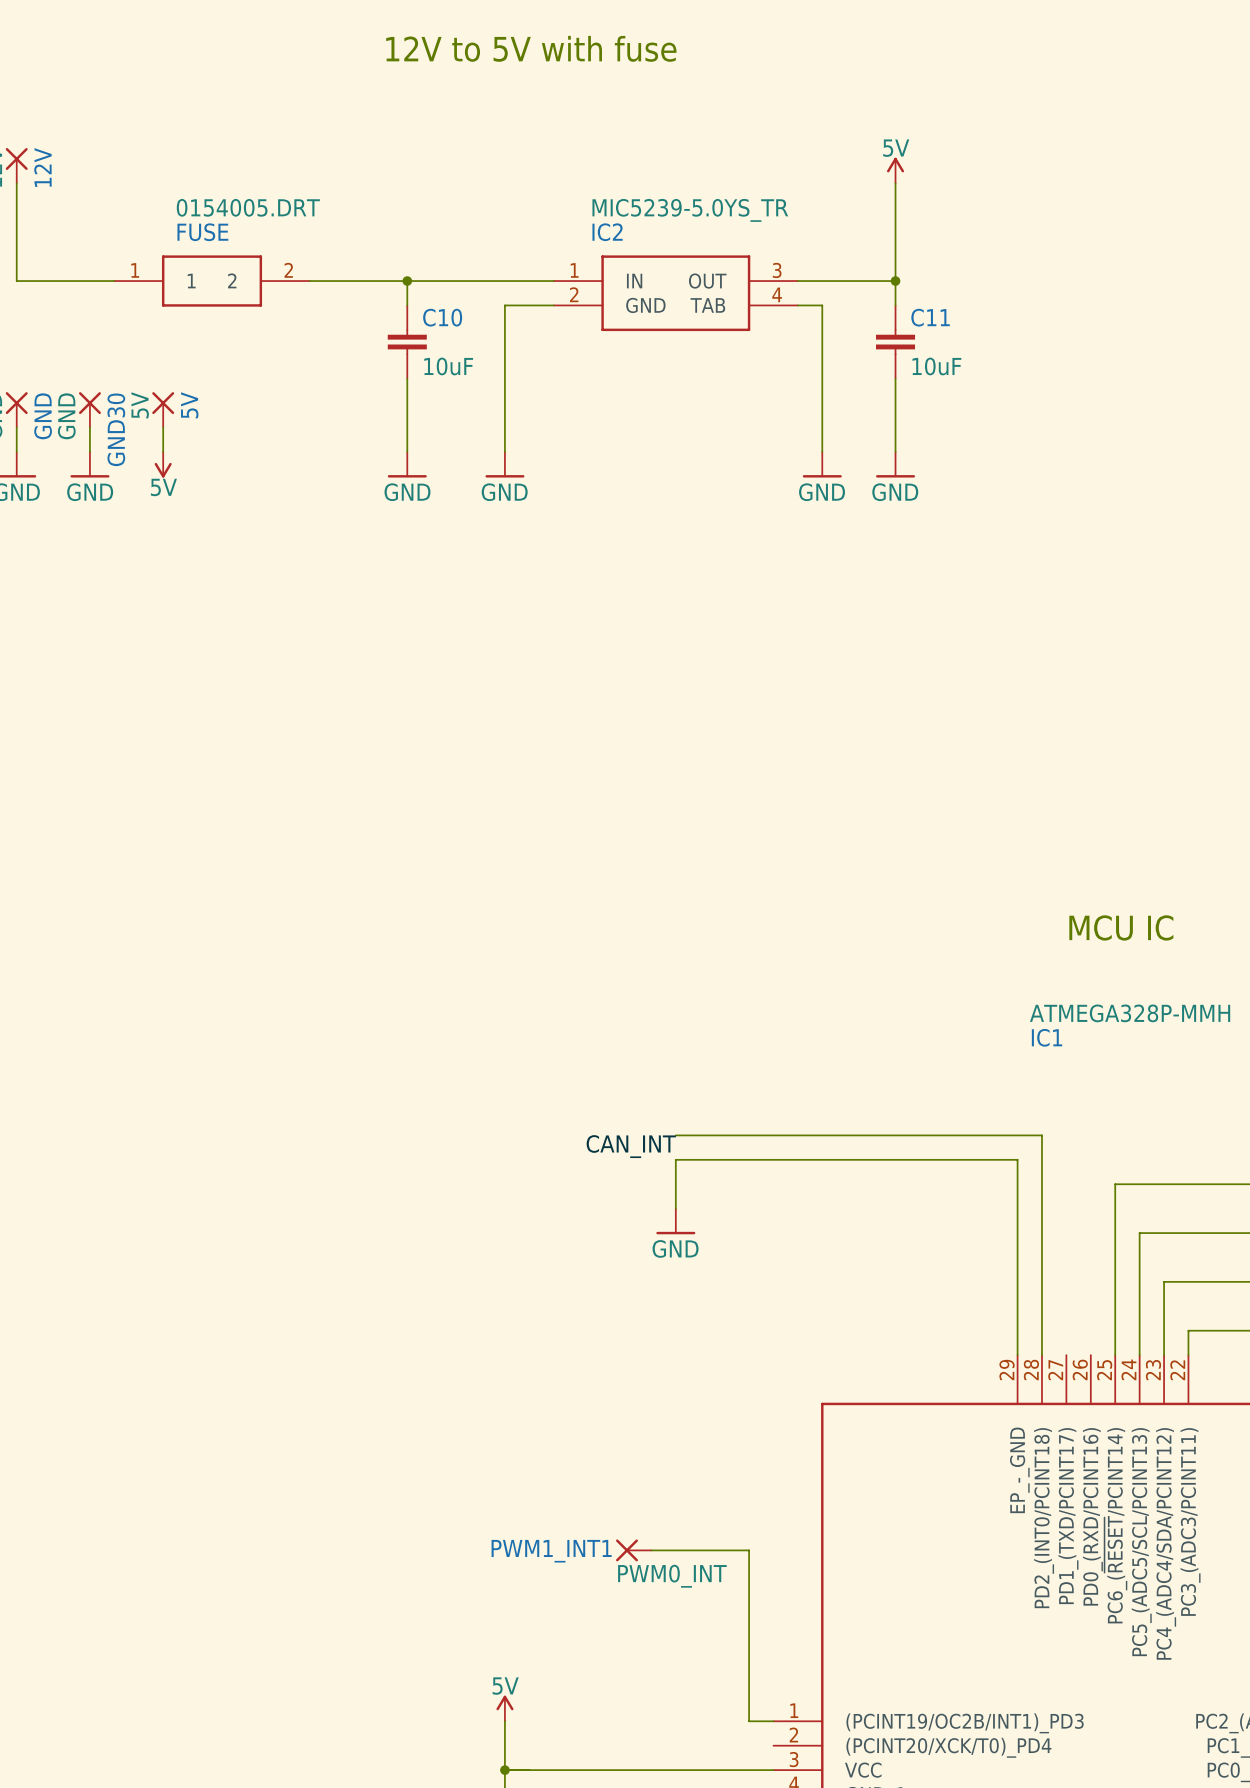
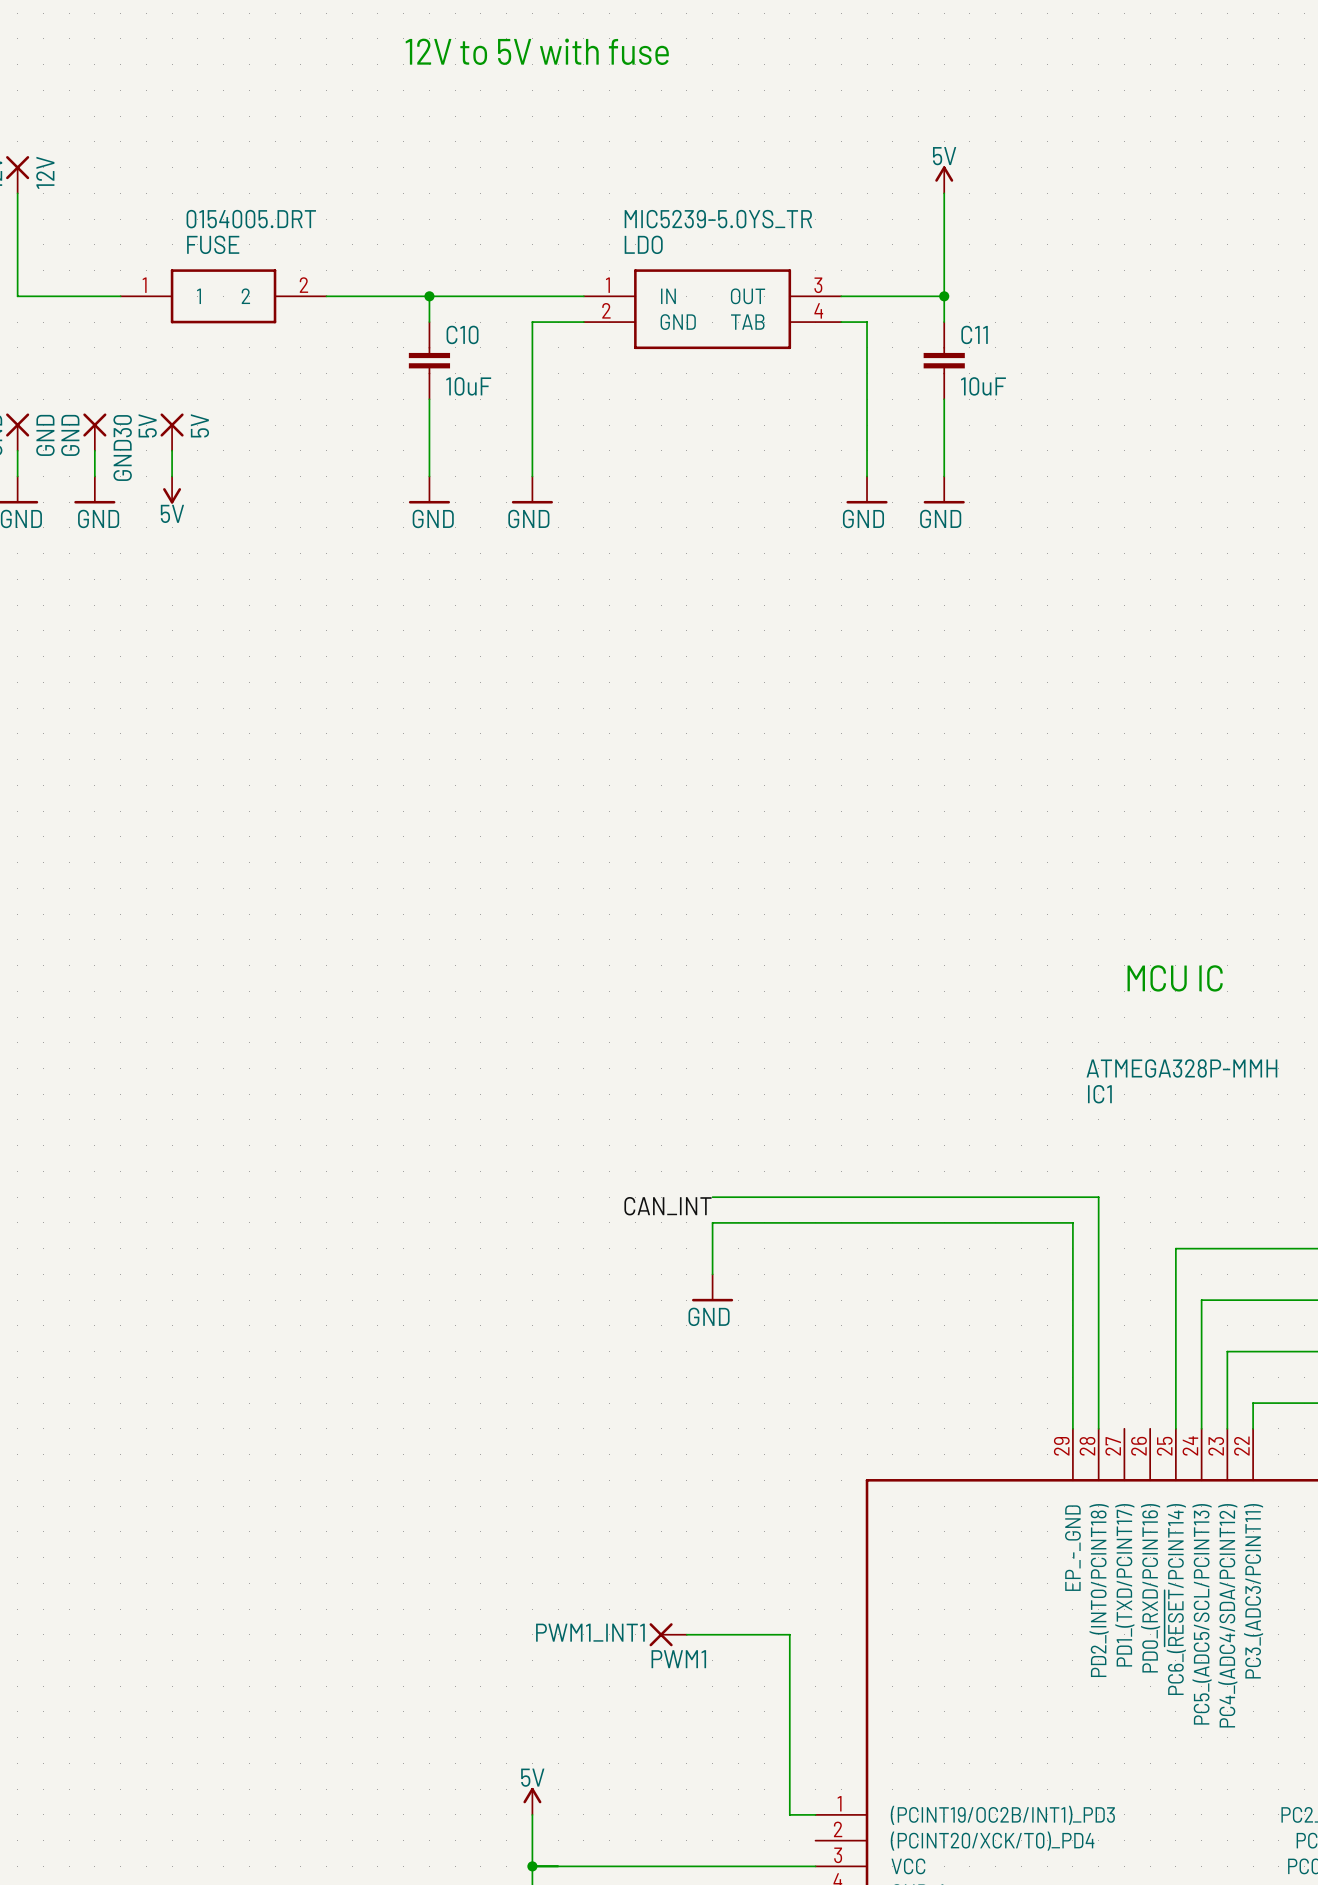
IC2 name: IC2 (607, 232) -> LDO (643, 244)
PWM1_INT1 value: PWM0_INT (672, 1576) -> PWM1 (678, 1659)

